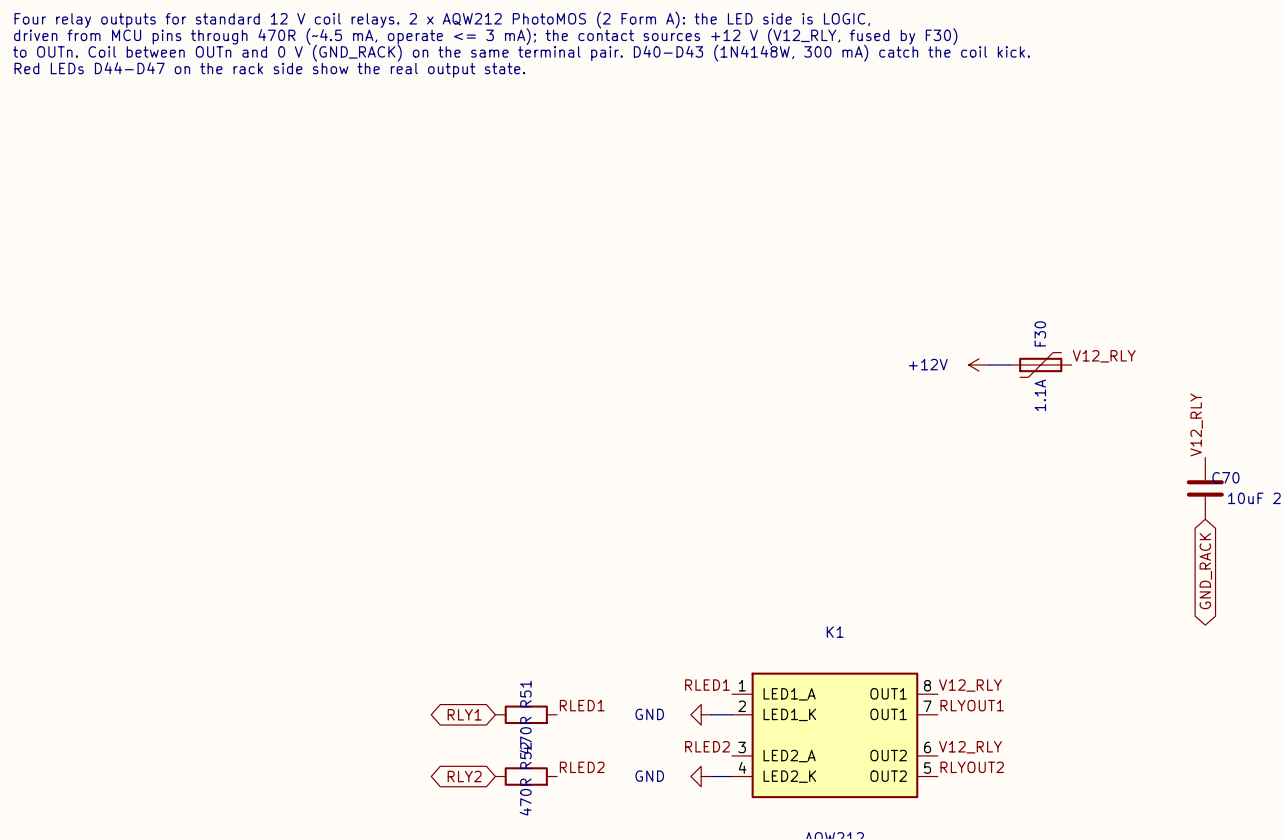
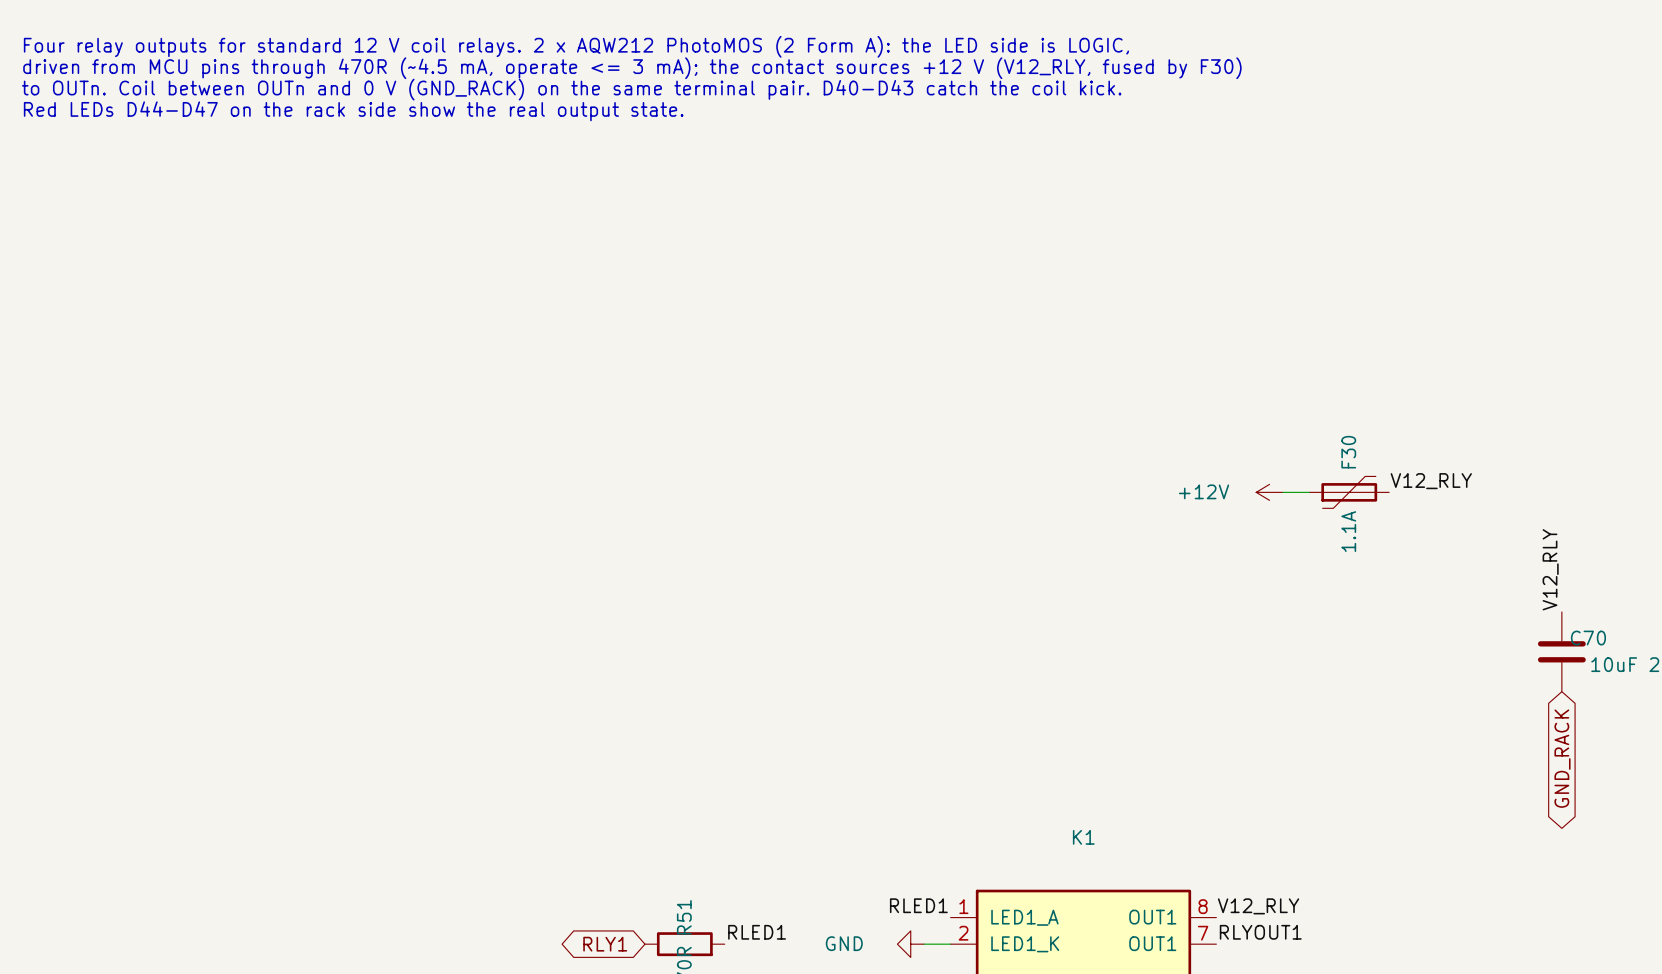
text: to OUTn. Coil between OUTn and 0 V (GND_RACK) on the same terminal pair. D40-D43 (1N4148W, 300 mA) catch the coil kick. (521, 53) -> to OUTn. Coil between OUTn and 0 V (GND_RACK) on the same terminal pair. D40-D43 catch the coil kick. (571, 89)

